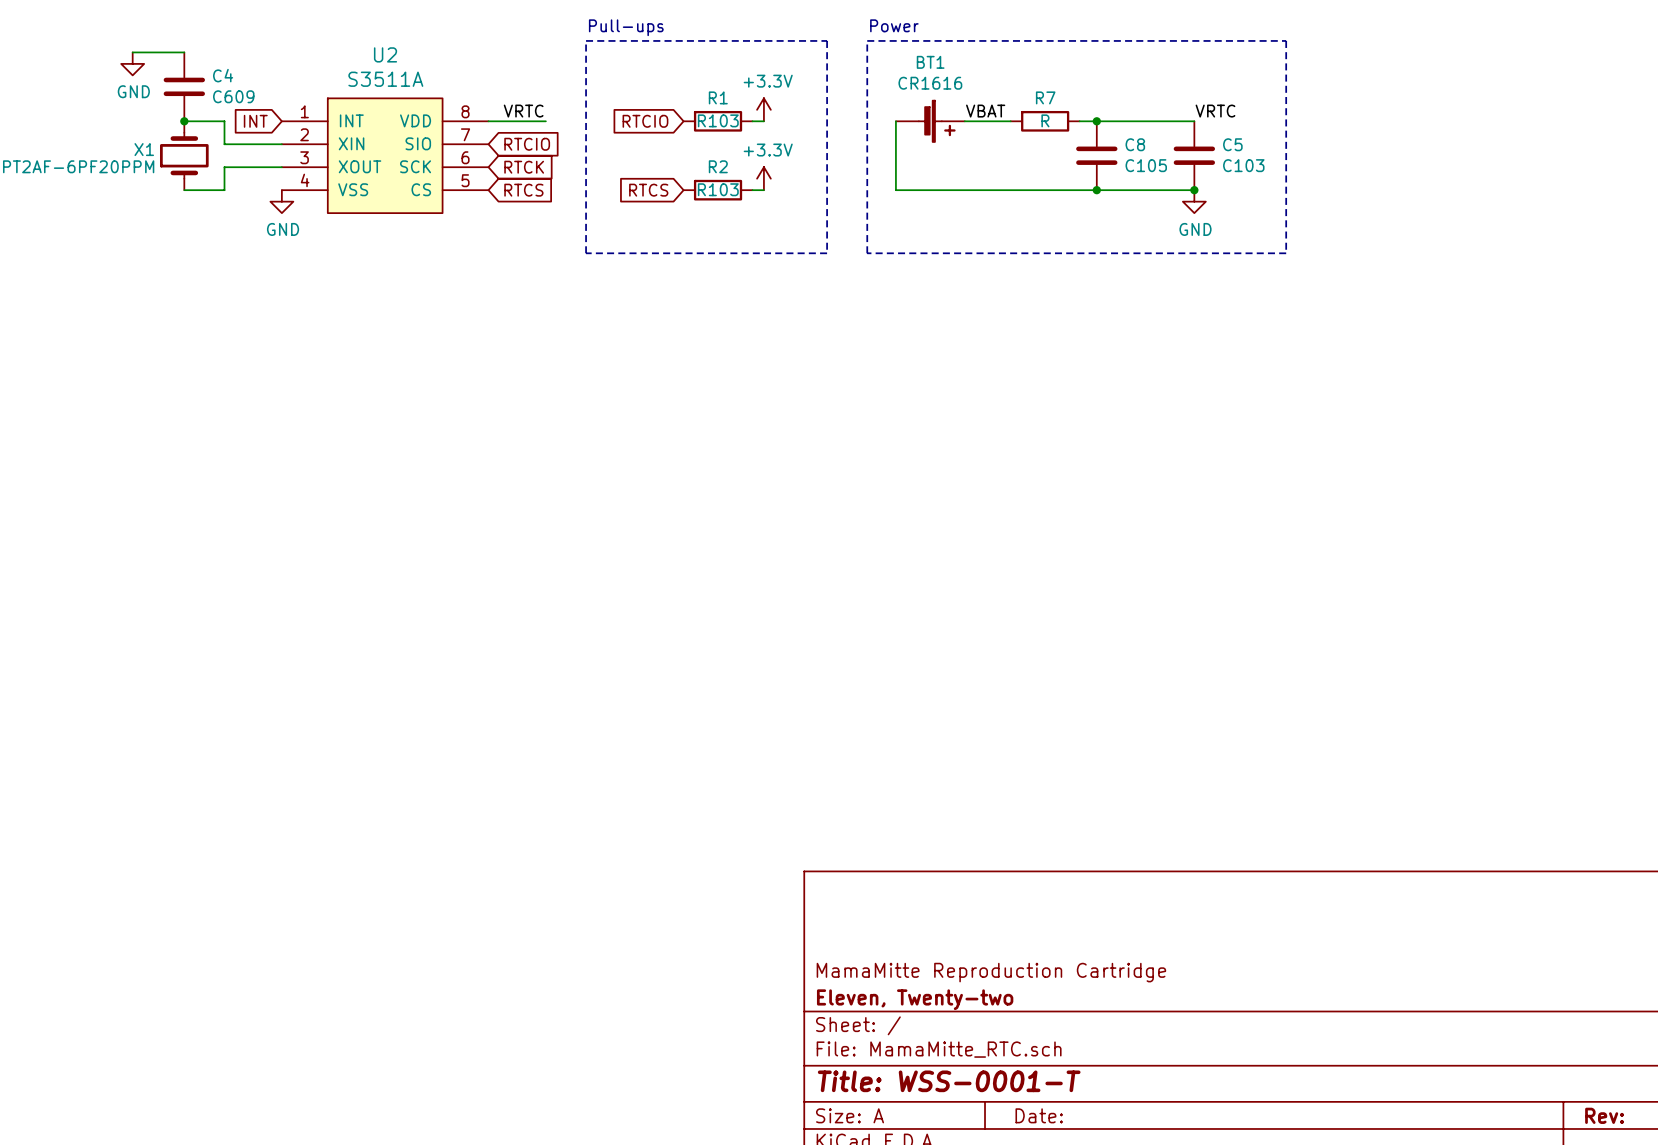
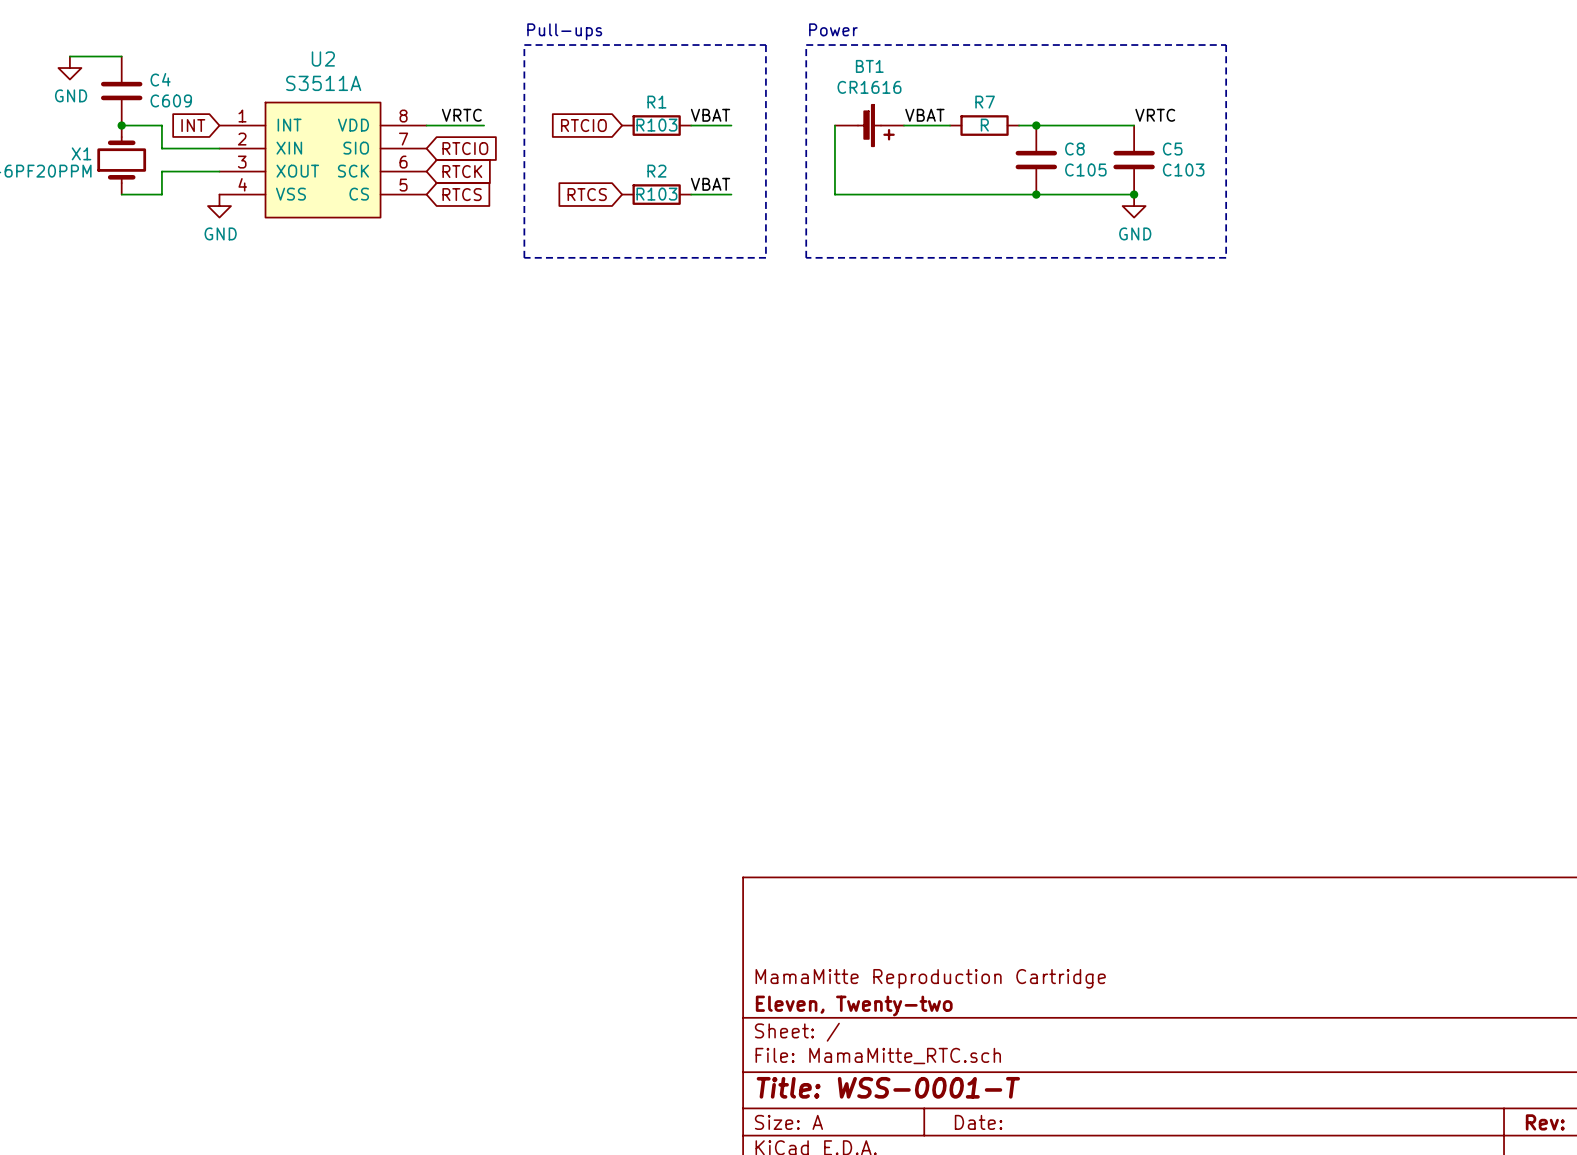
power symbol: +3.3V (763, 109) -> none
label: none -> VBAT (710, 115)
wire: none -> (702, 125) (731, 125)
power symbol: +3.3V (763, 178) -> none
label: none -> VBAT (710, 184)
wire: none -> (702, 194) (731, 194)

